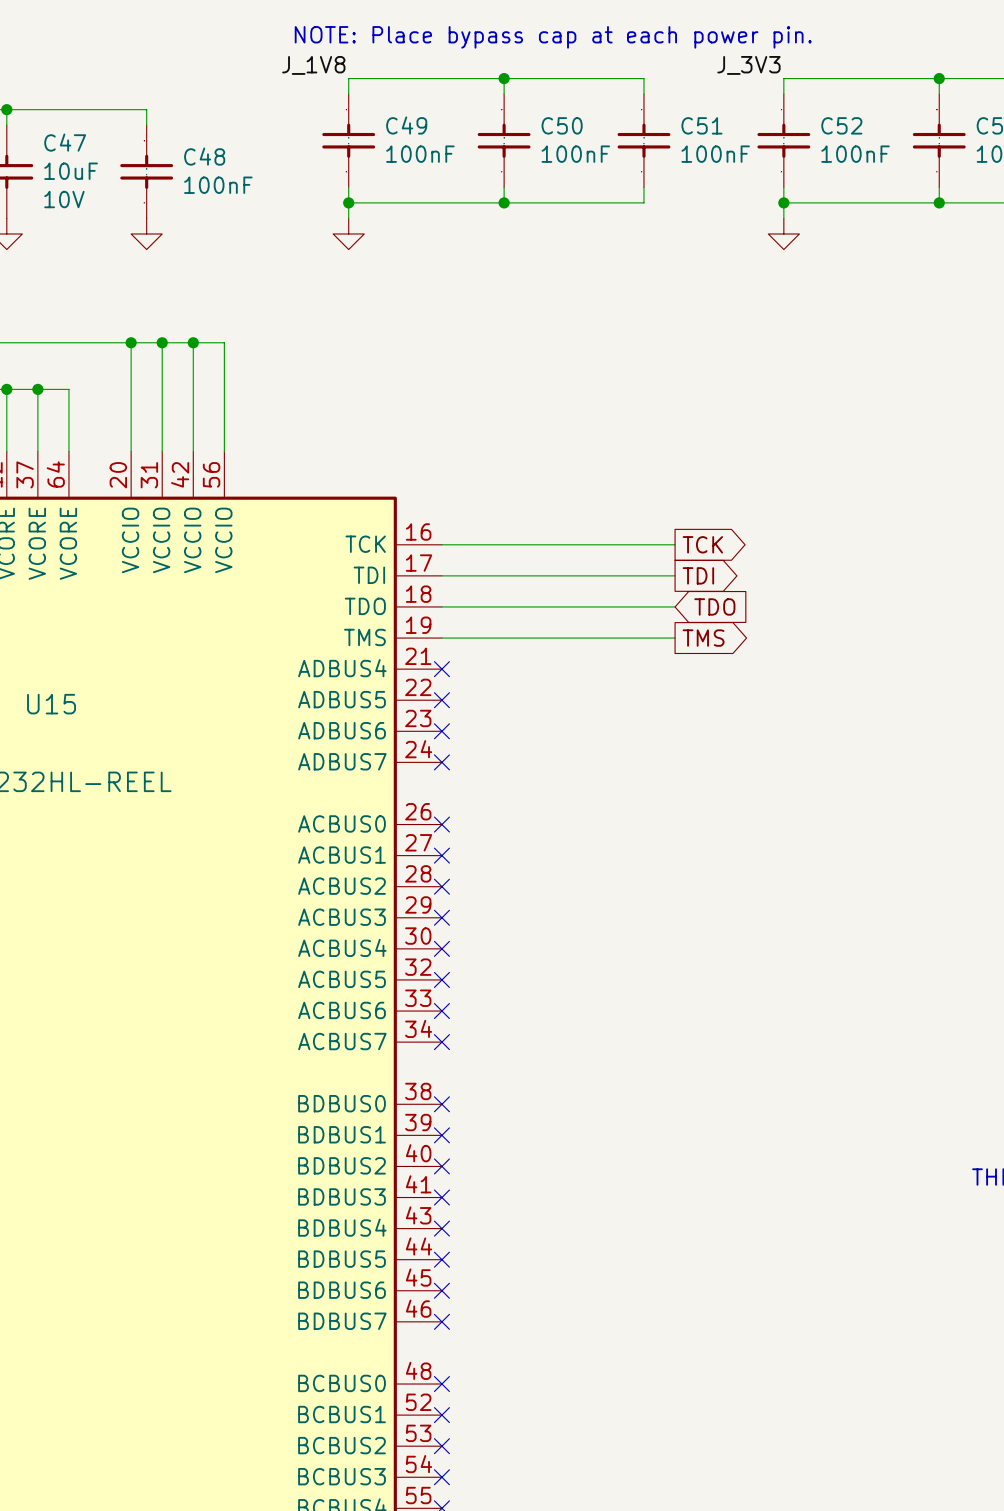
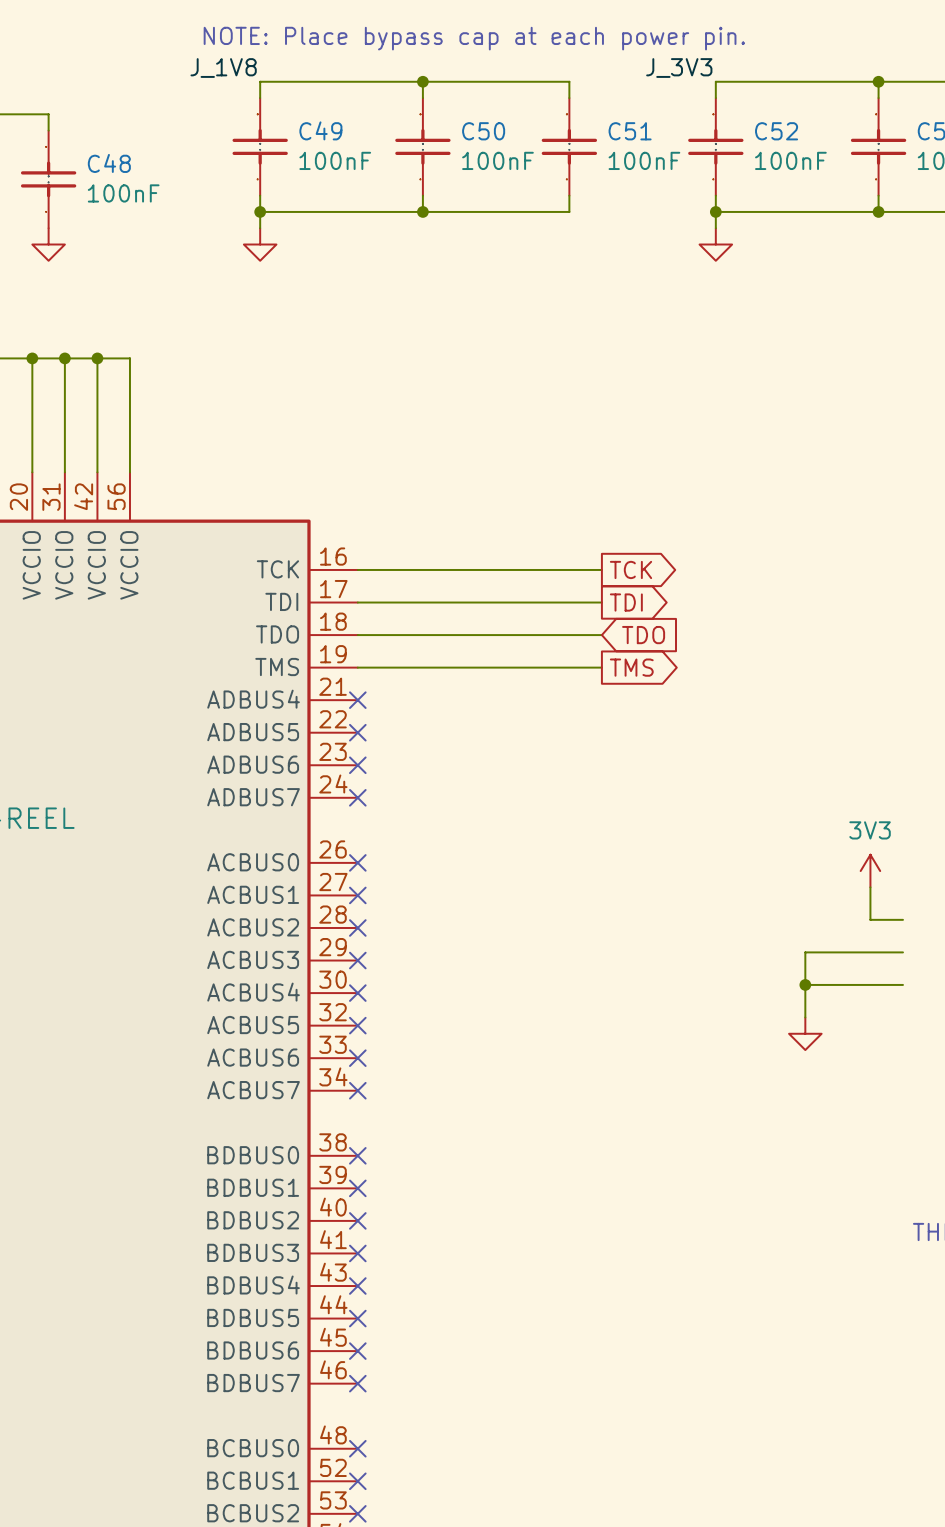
power symbol: none -> 3V3 (870, 871)
wire: none -> (870, 887) (870, 919) (902, 919)
wire: none -> (902, 952) (805, 952) (805, 1017)
wire: none -> (805, 984) (902, 984)
junction: none -> (805, 984)
power symbol: none -> (805, 1033)

